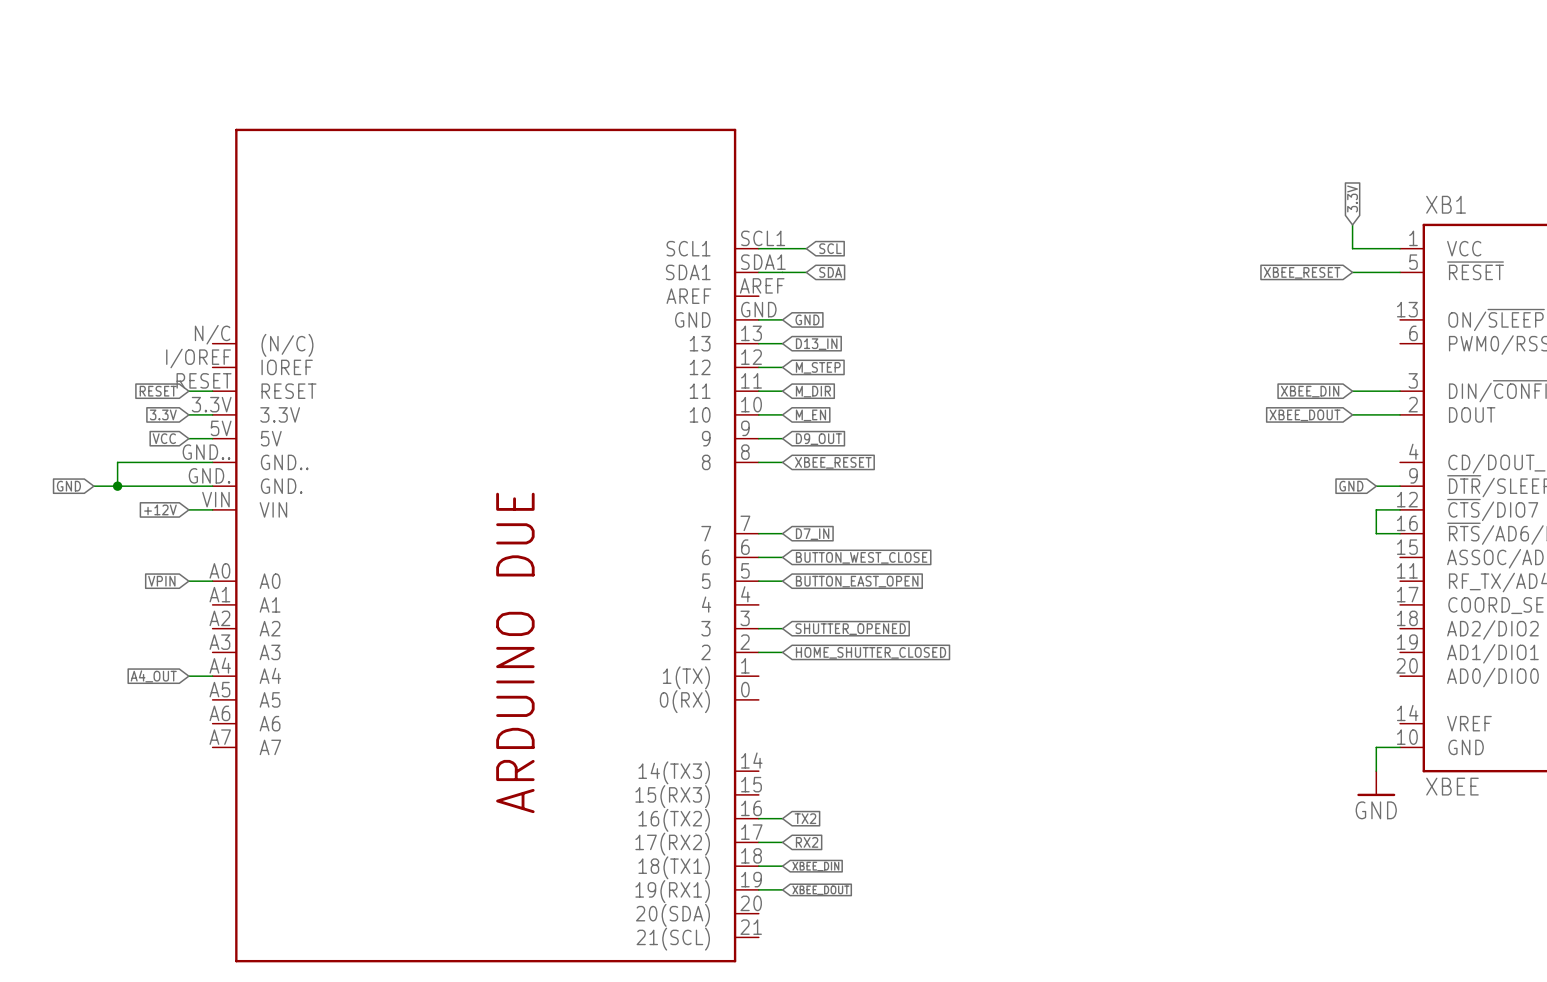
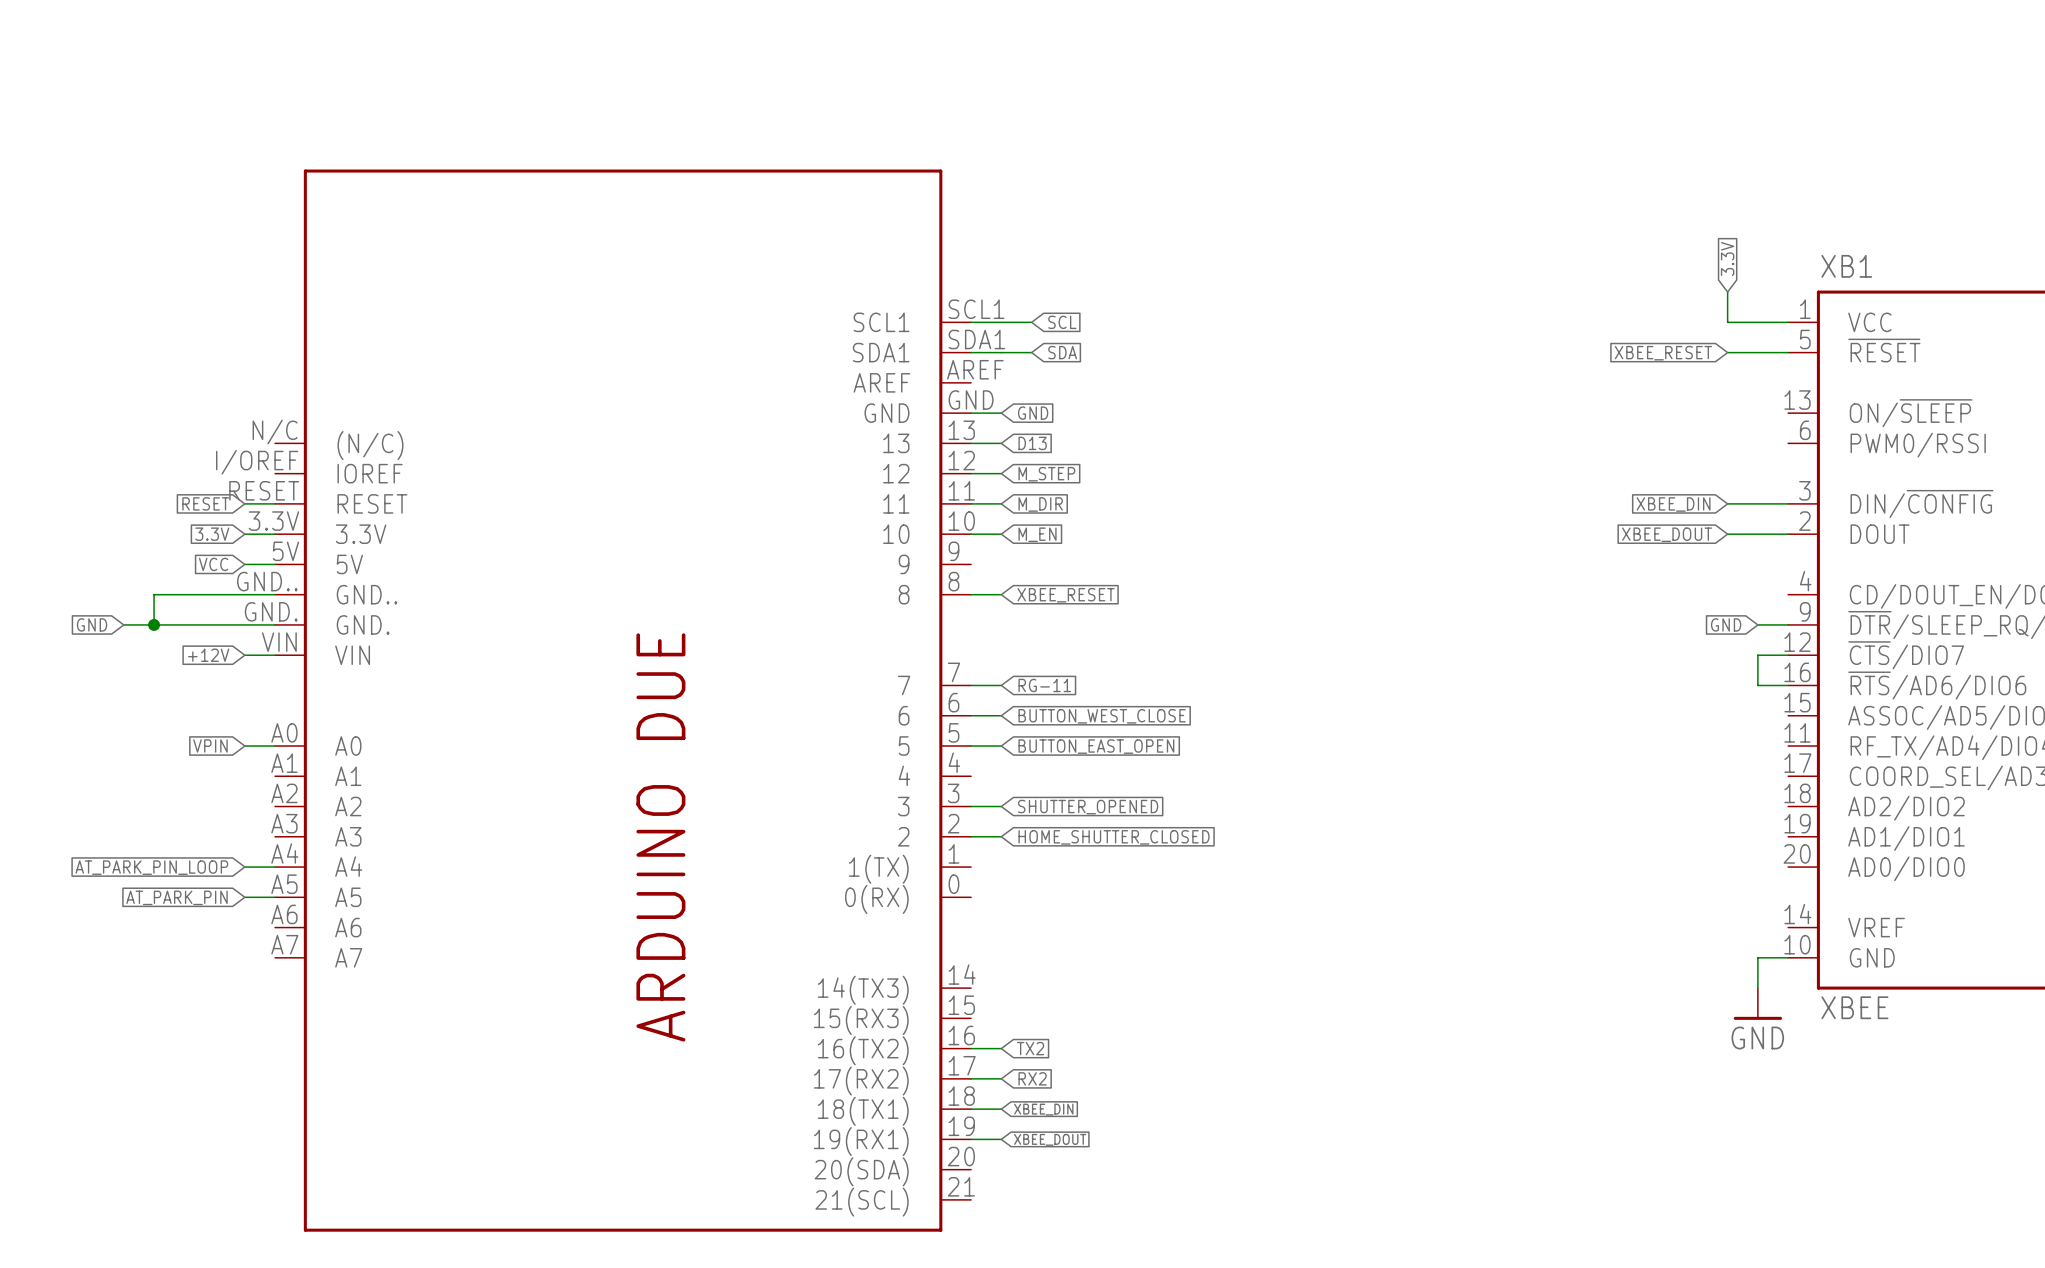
global label: D13_IN (816, 344) -> D13 (1032, 443)
wire: (758, 438) (782, 438) -> none
global label: D9_OUT (818, 439) -> none
global label: D7_IN (812, 534) -> RG-11 (1044, 685)
global label: A4_OUT (153, 676) -> AT_PARK_PIN_LOOP (151, 867)
wire: none -> (244, 897) (275, 897)
global label: none -> AT_PARK_PIN (177, 897)

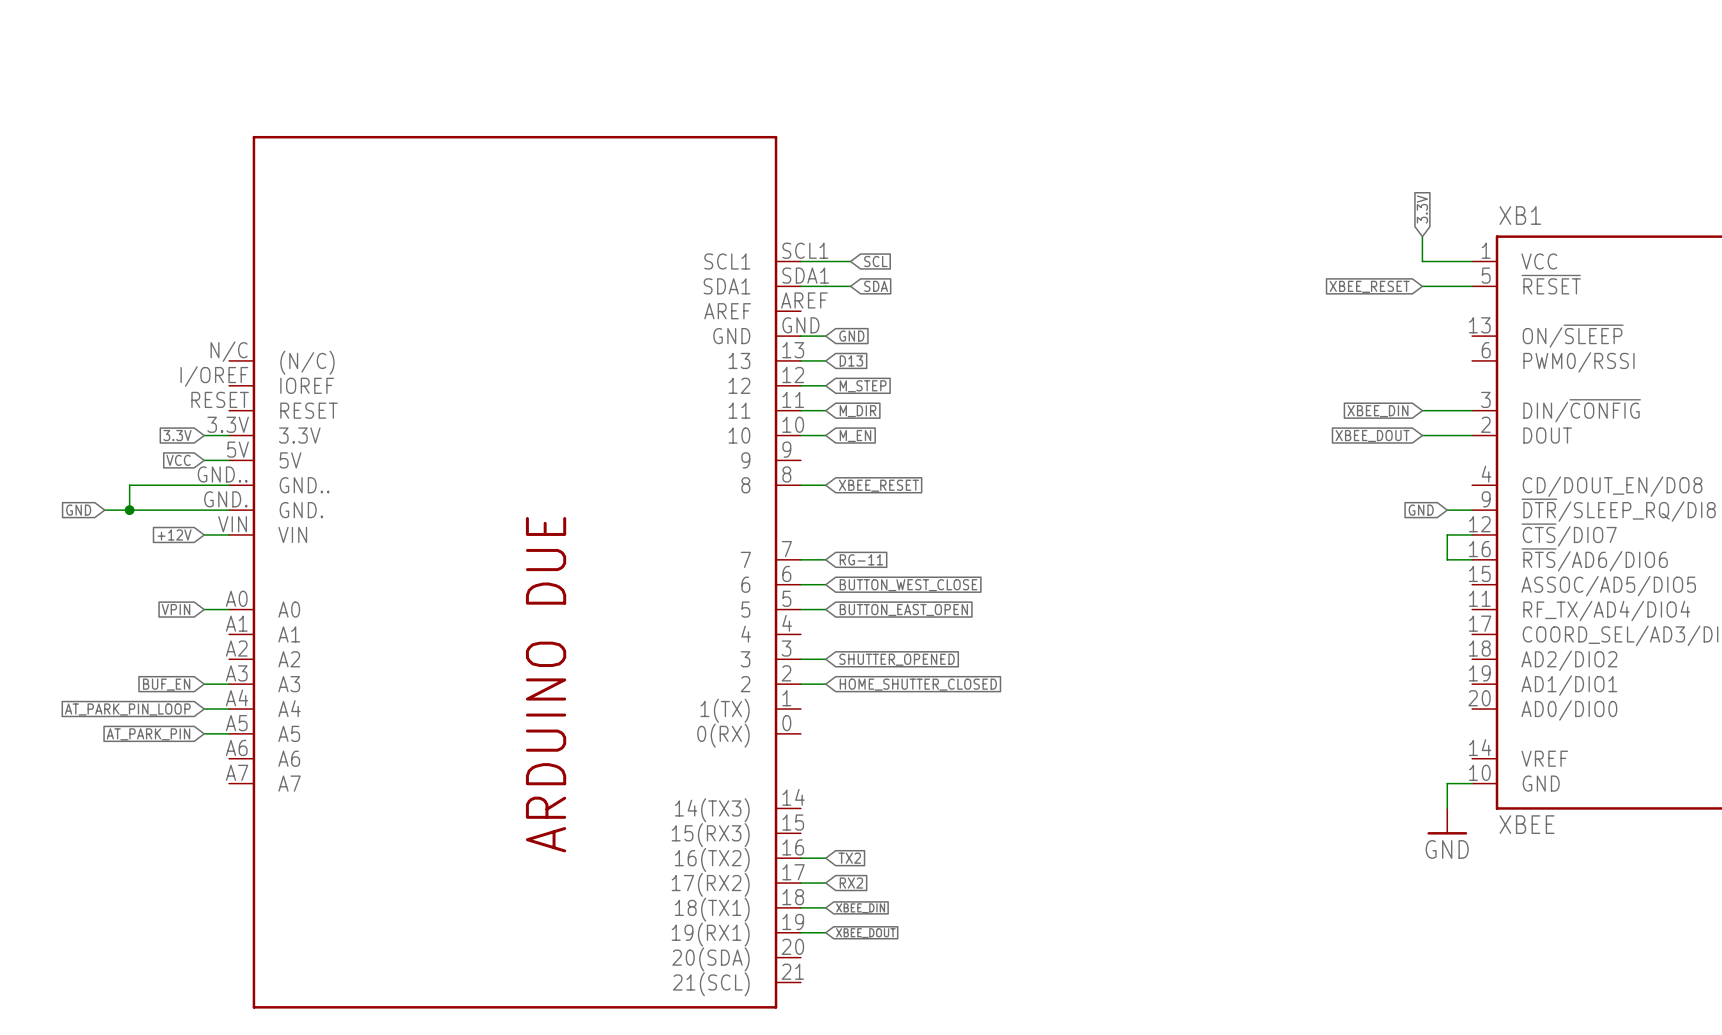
global label: RESET (205, 503) -> none
wire: (244, 503) (275, 503) -> none
wire: none -> (204, 684) (229, 684)
global label: none -> BUF_EN (166, 684)

